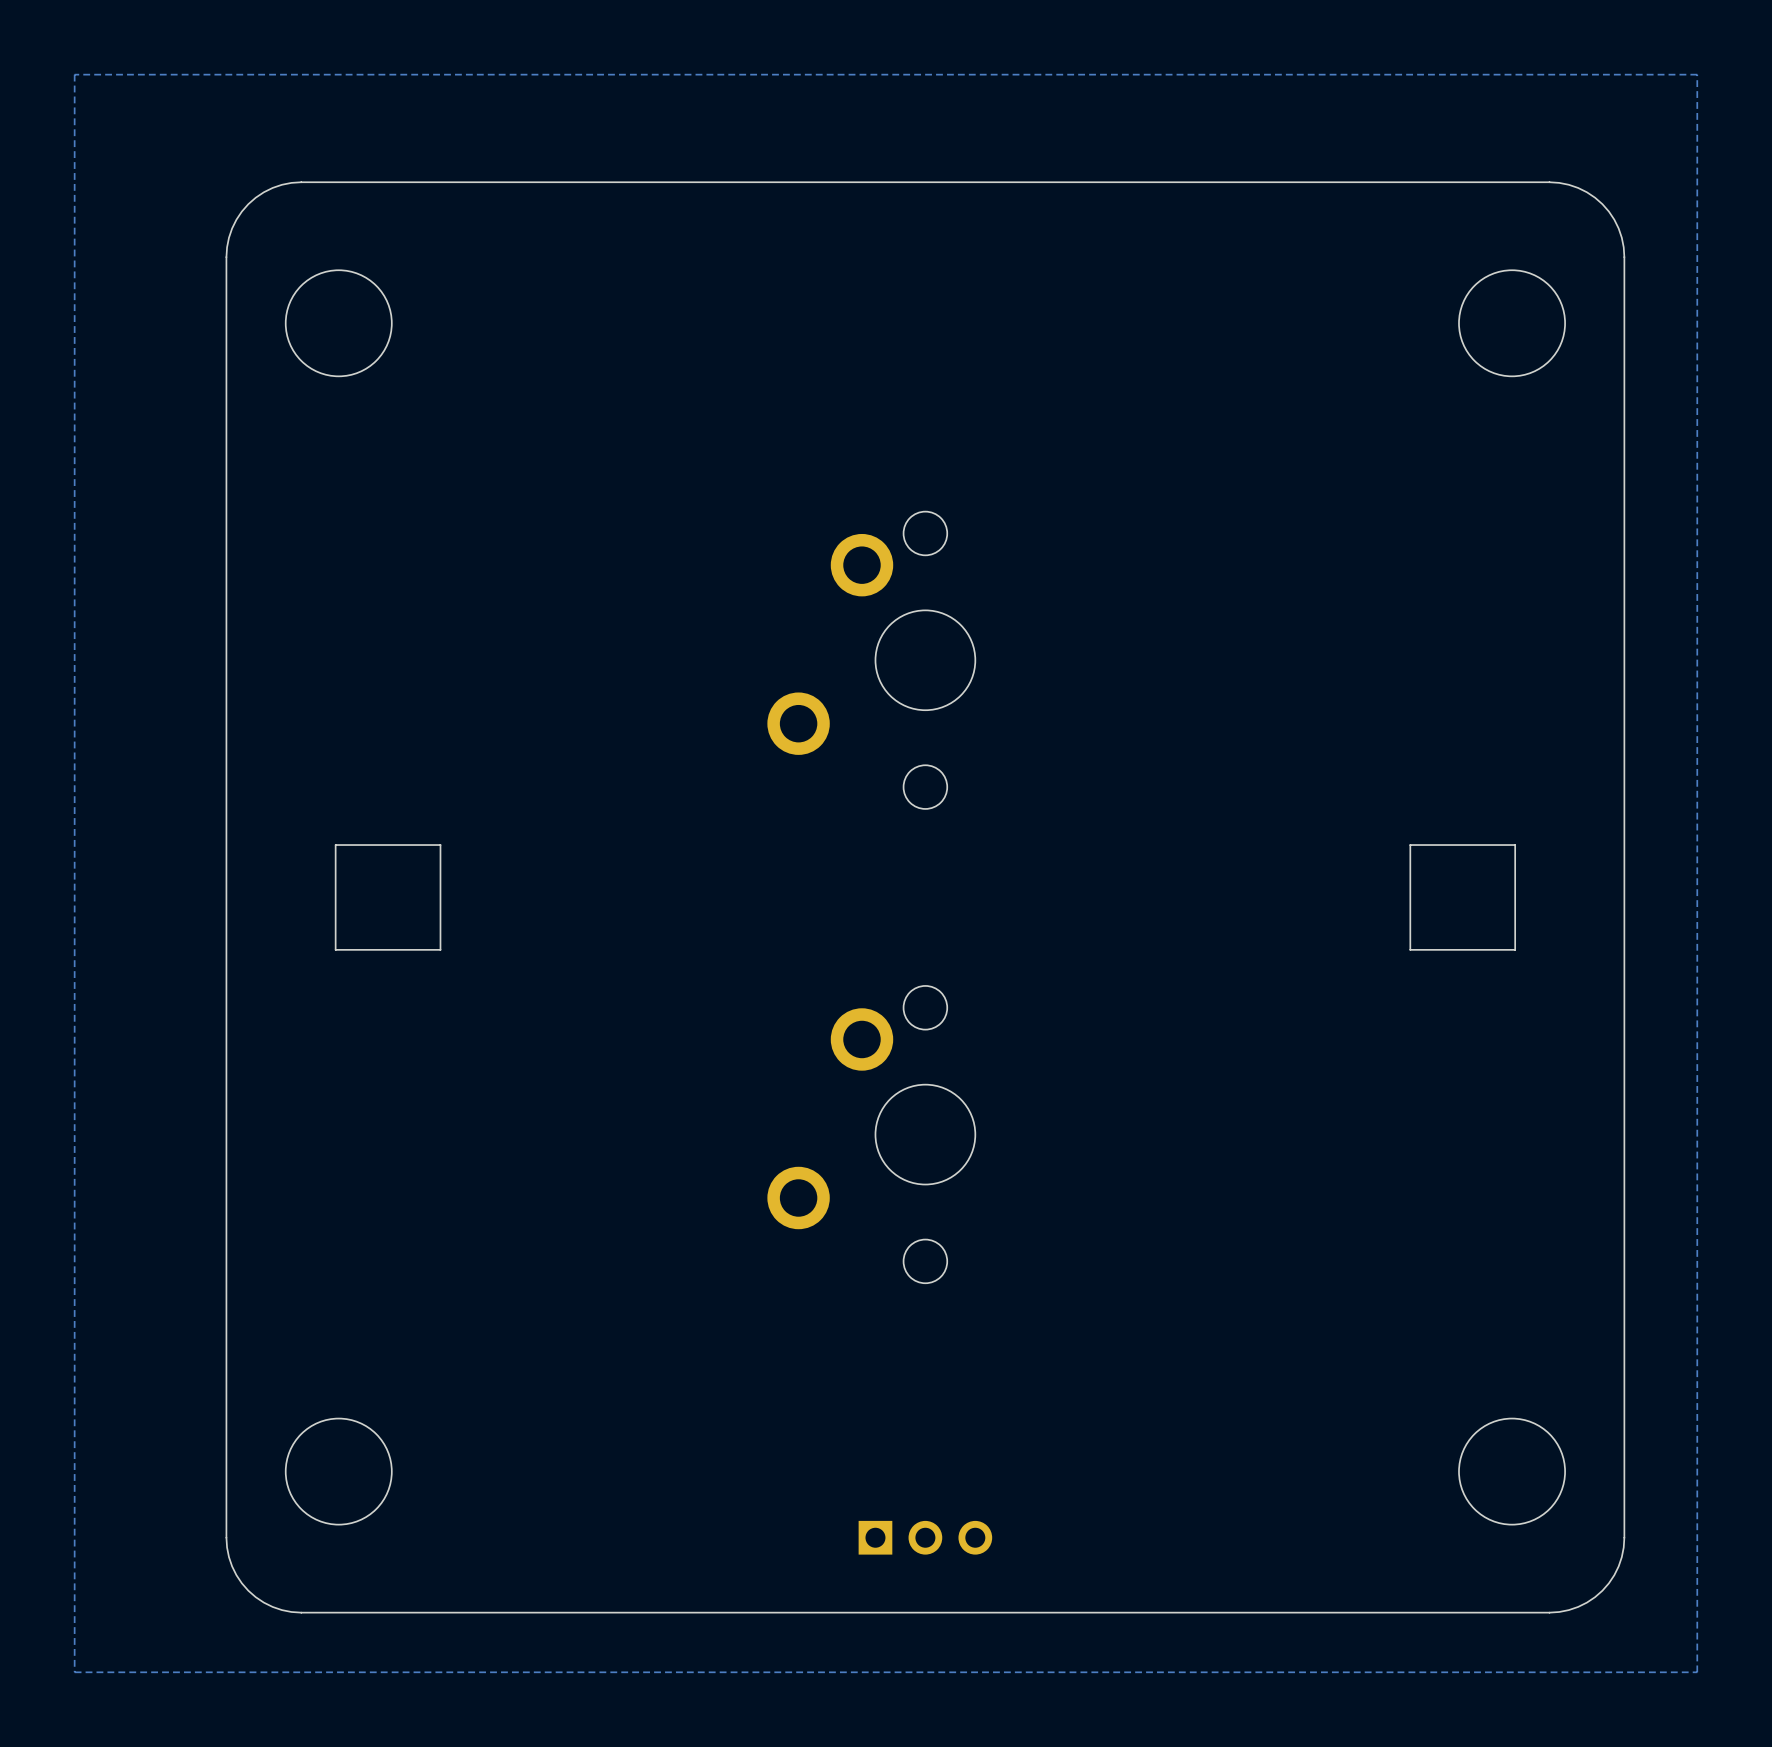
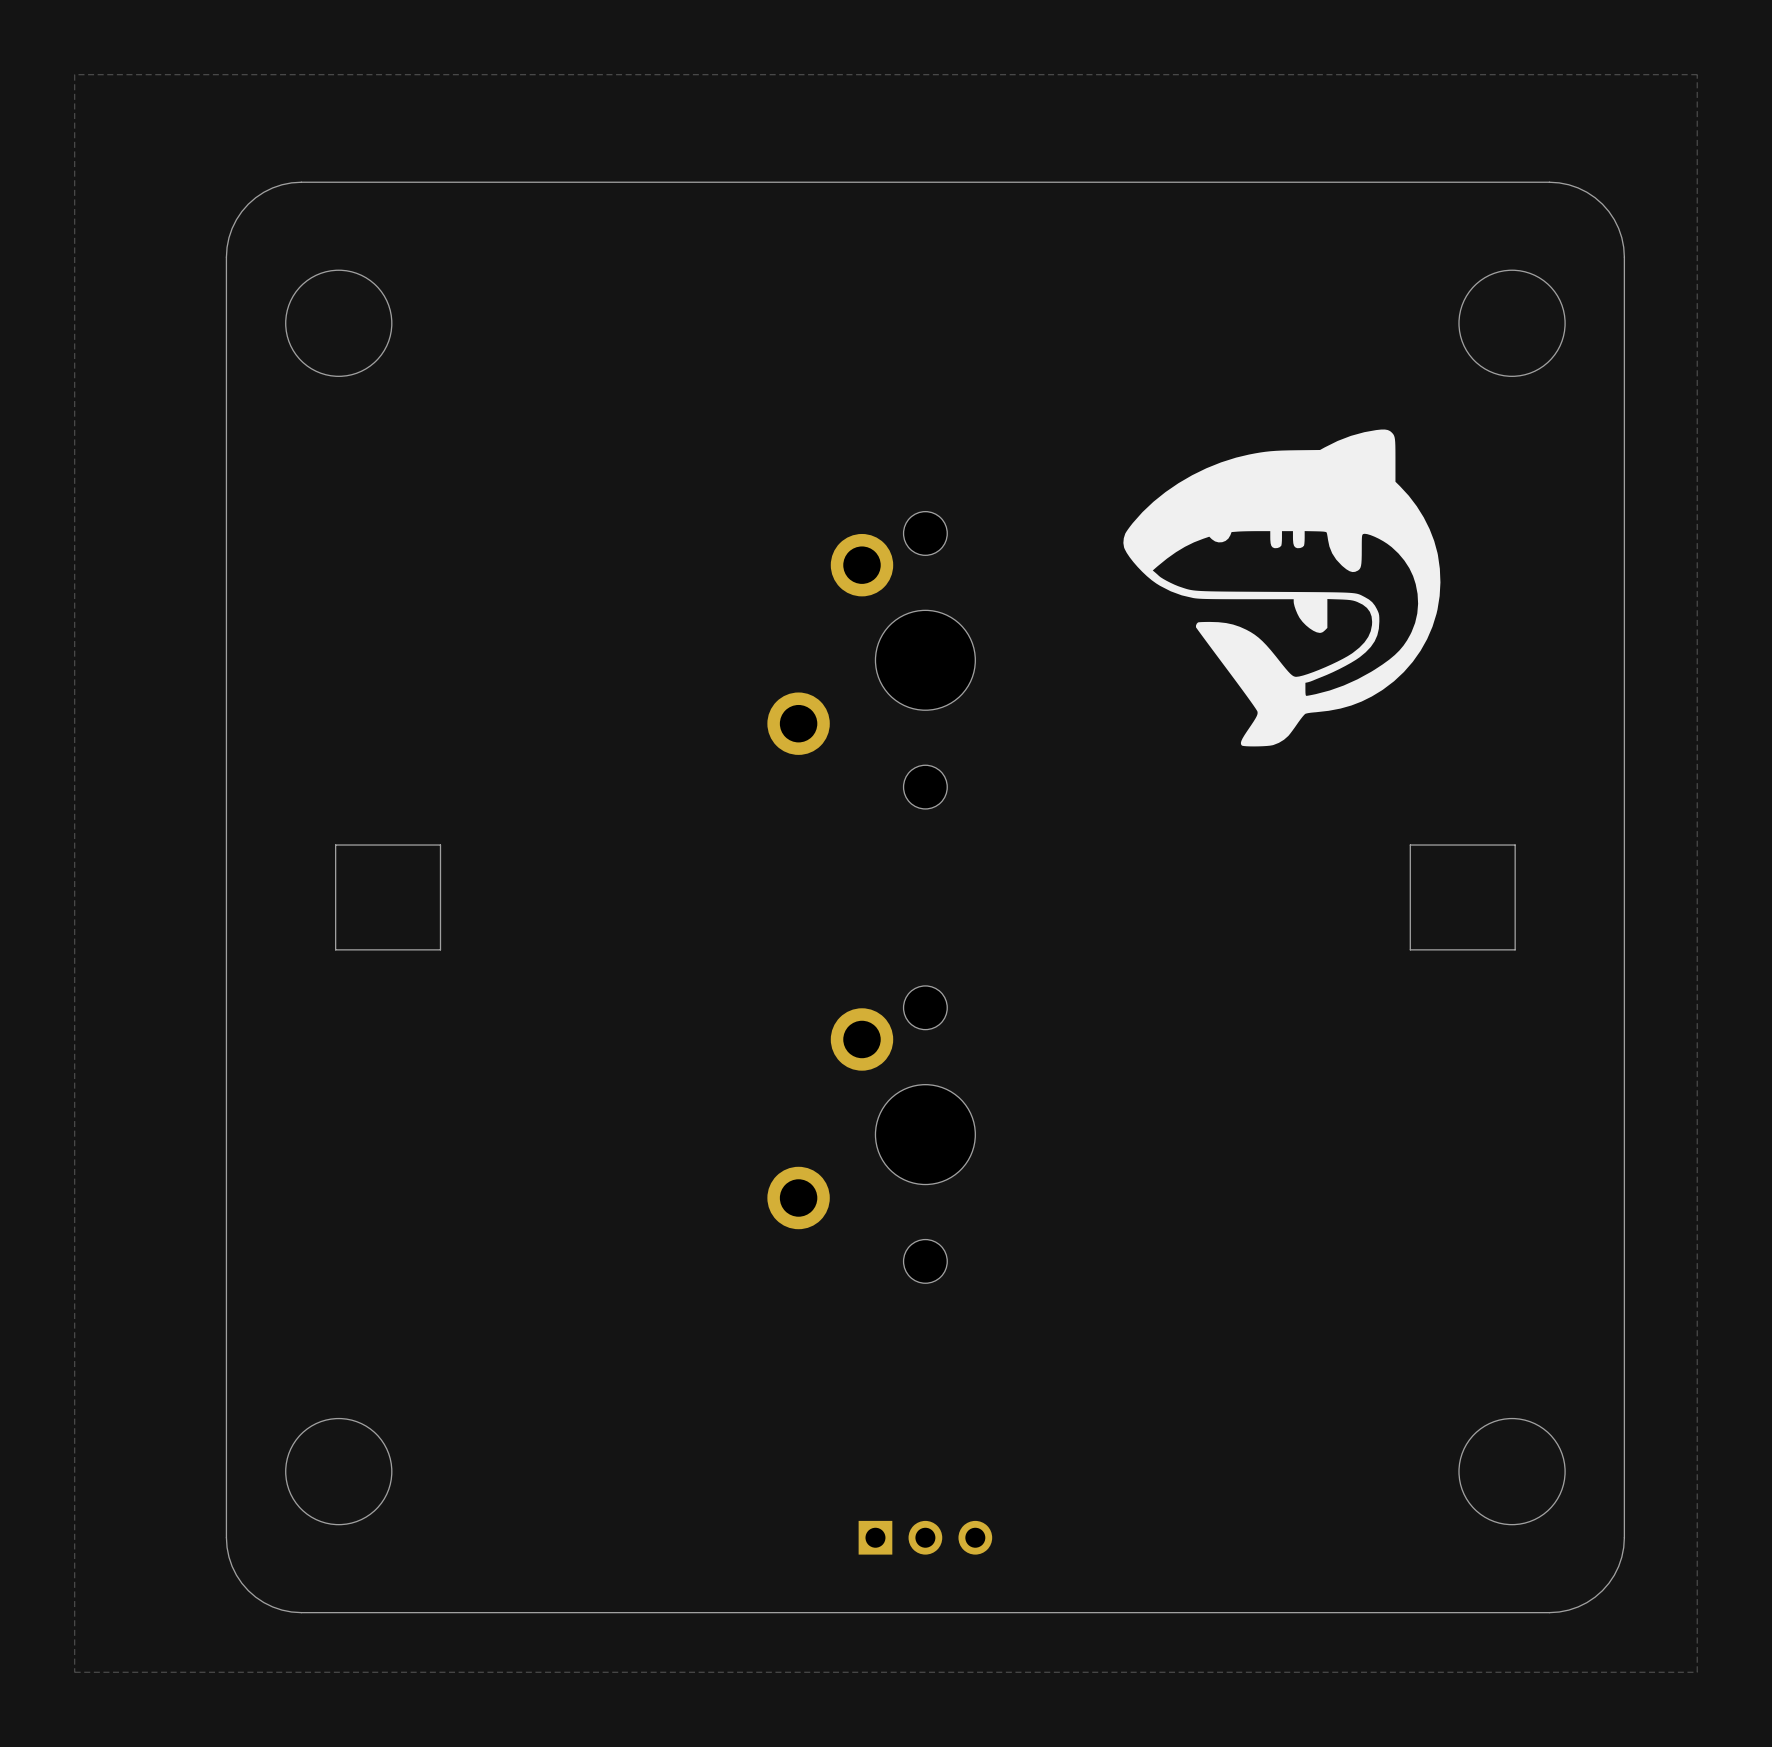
drawing: none -> [1123, 429, 1441, 747]

